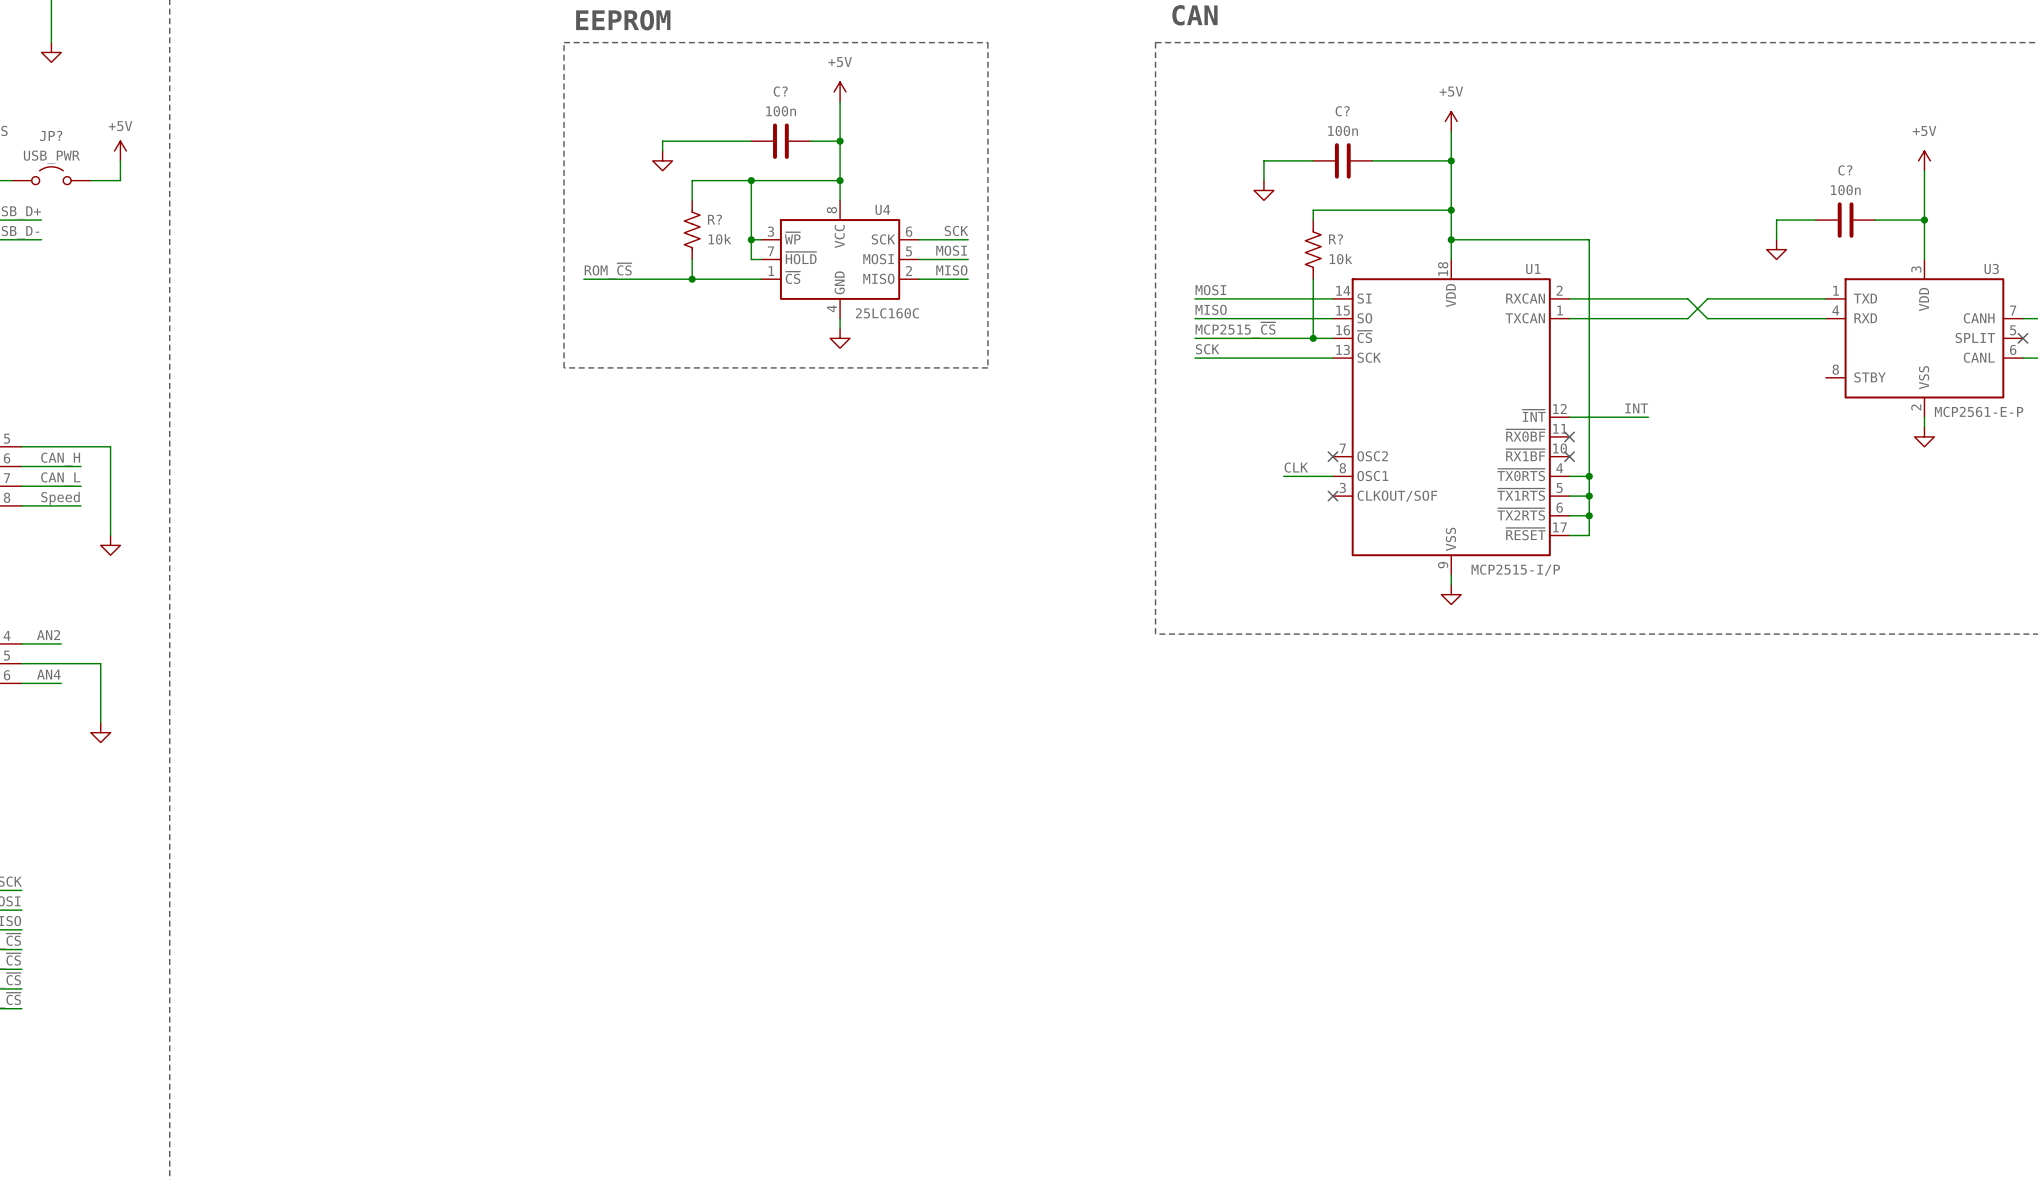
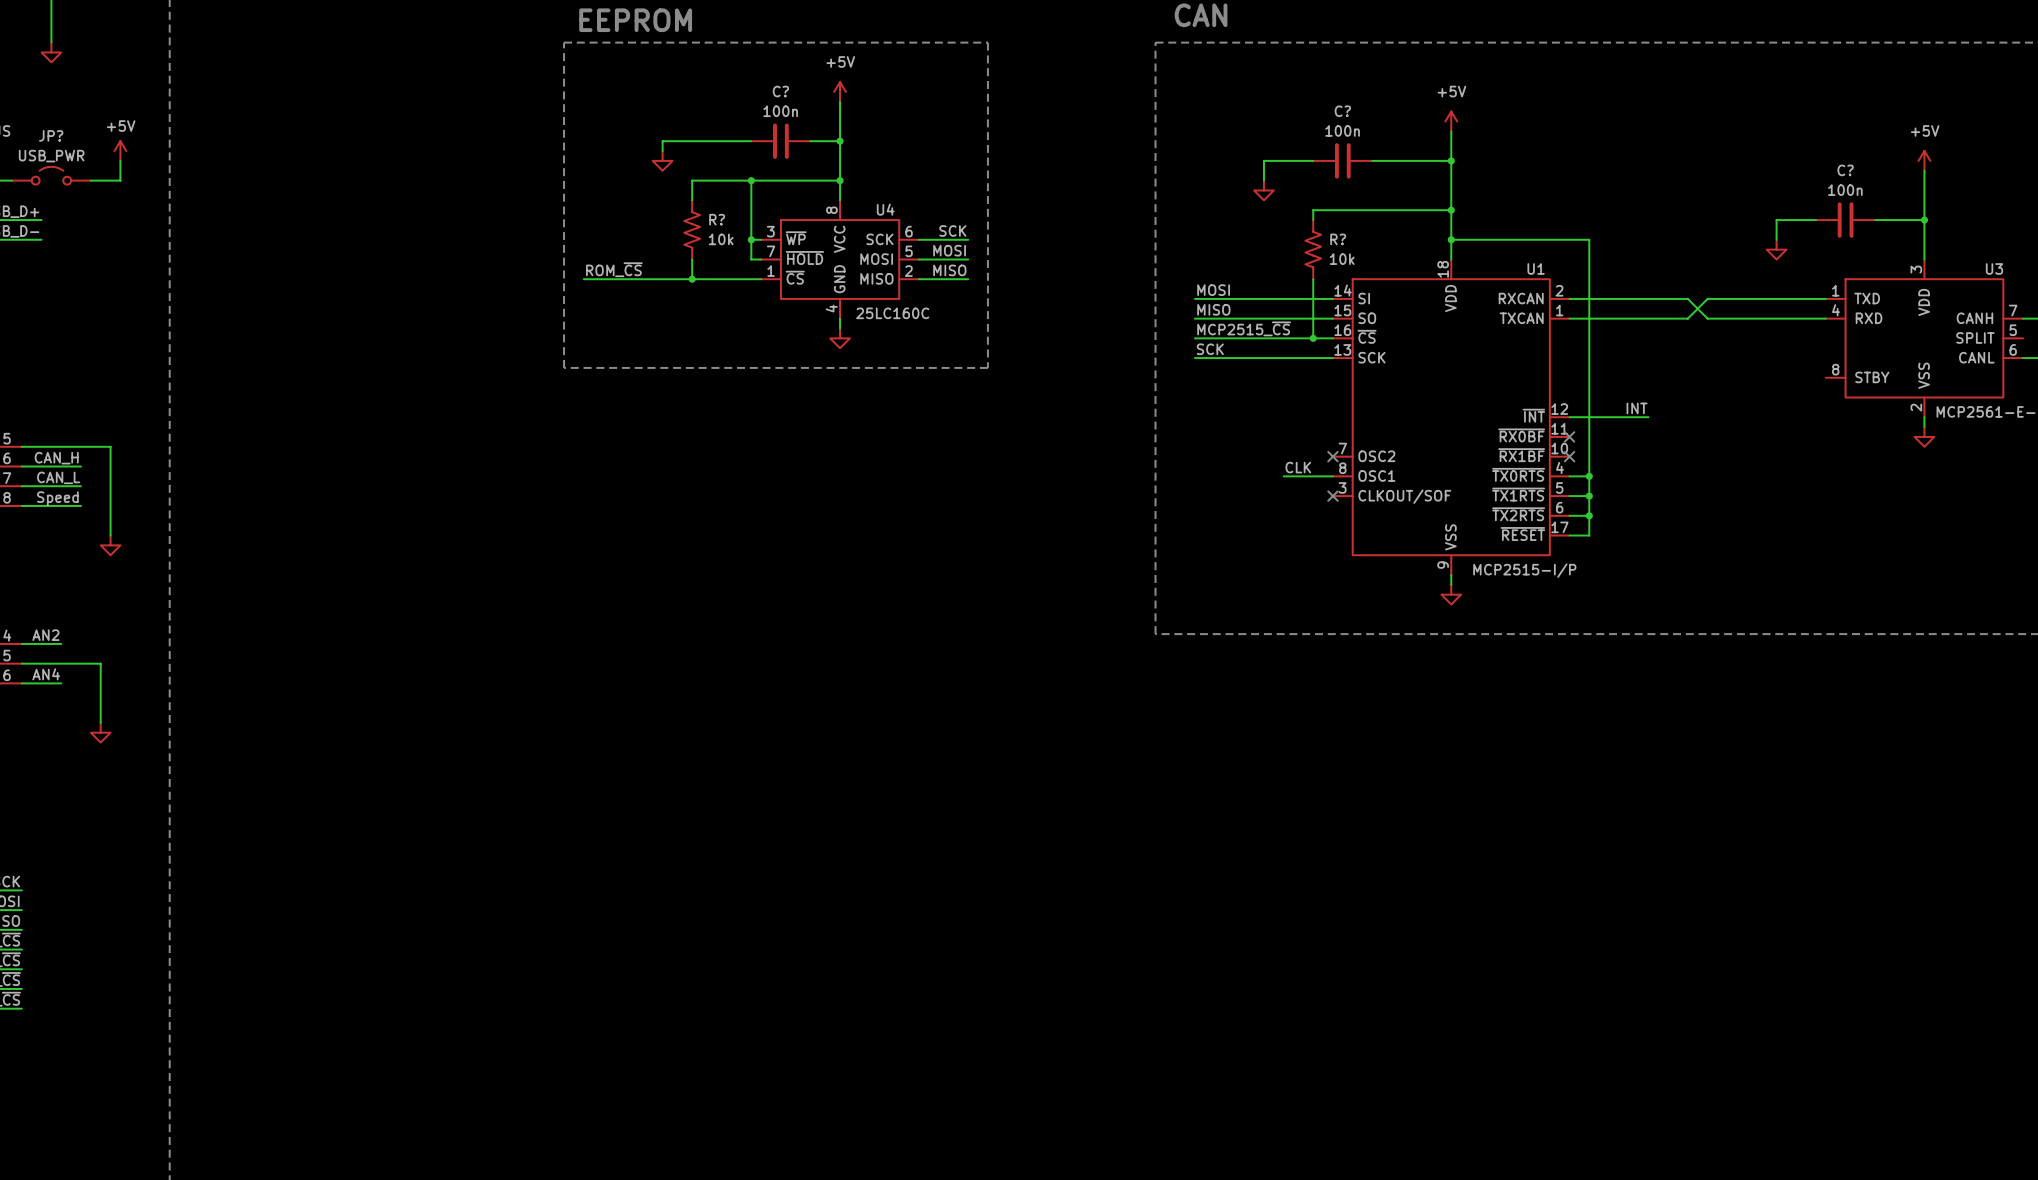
no-connect mark: (2023, 338) -> none

